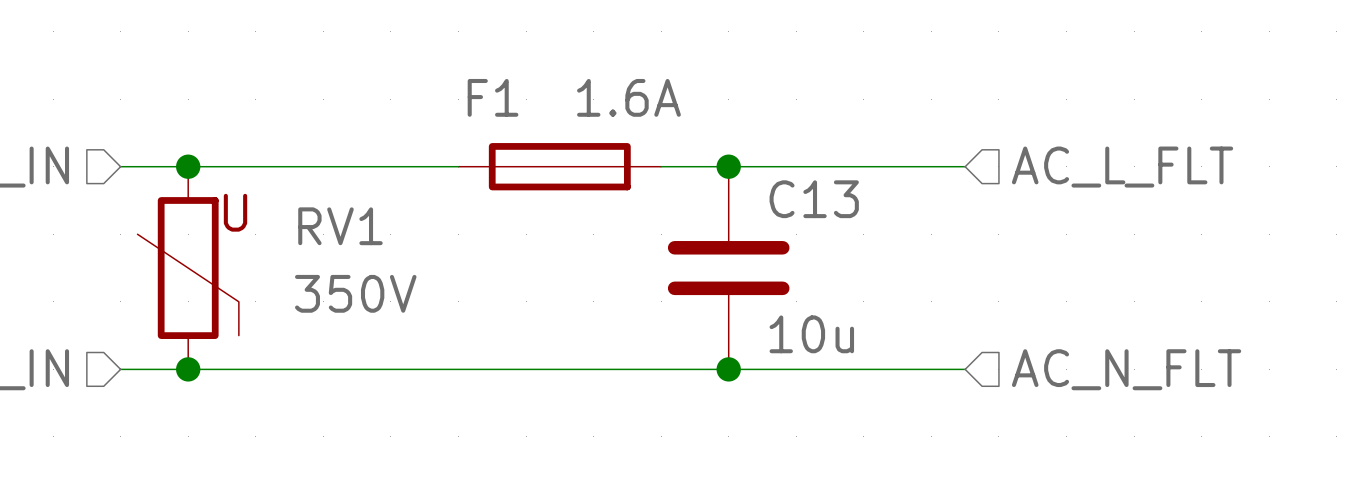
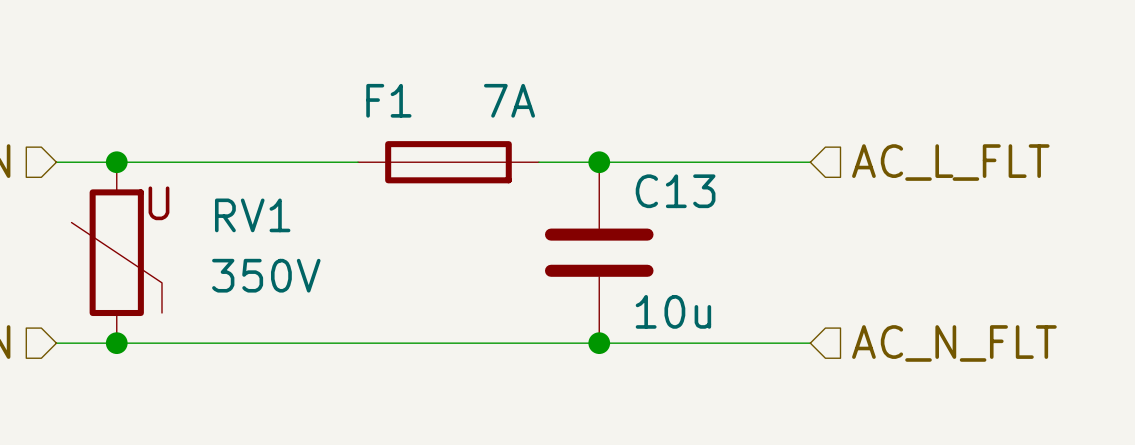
F1 value: 1.6A (628, 97) -> 7A (509, 100)

